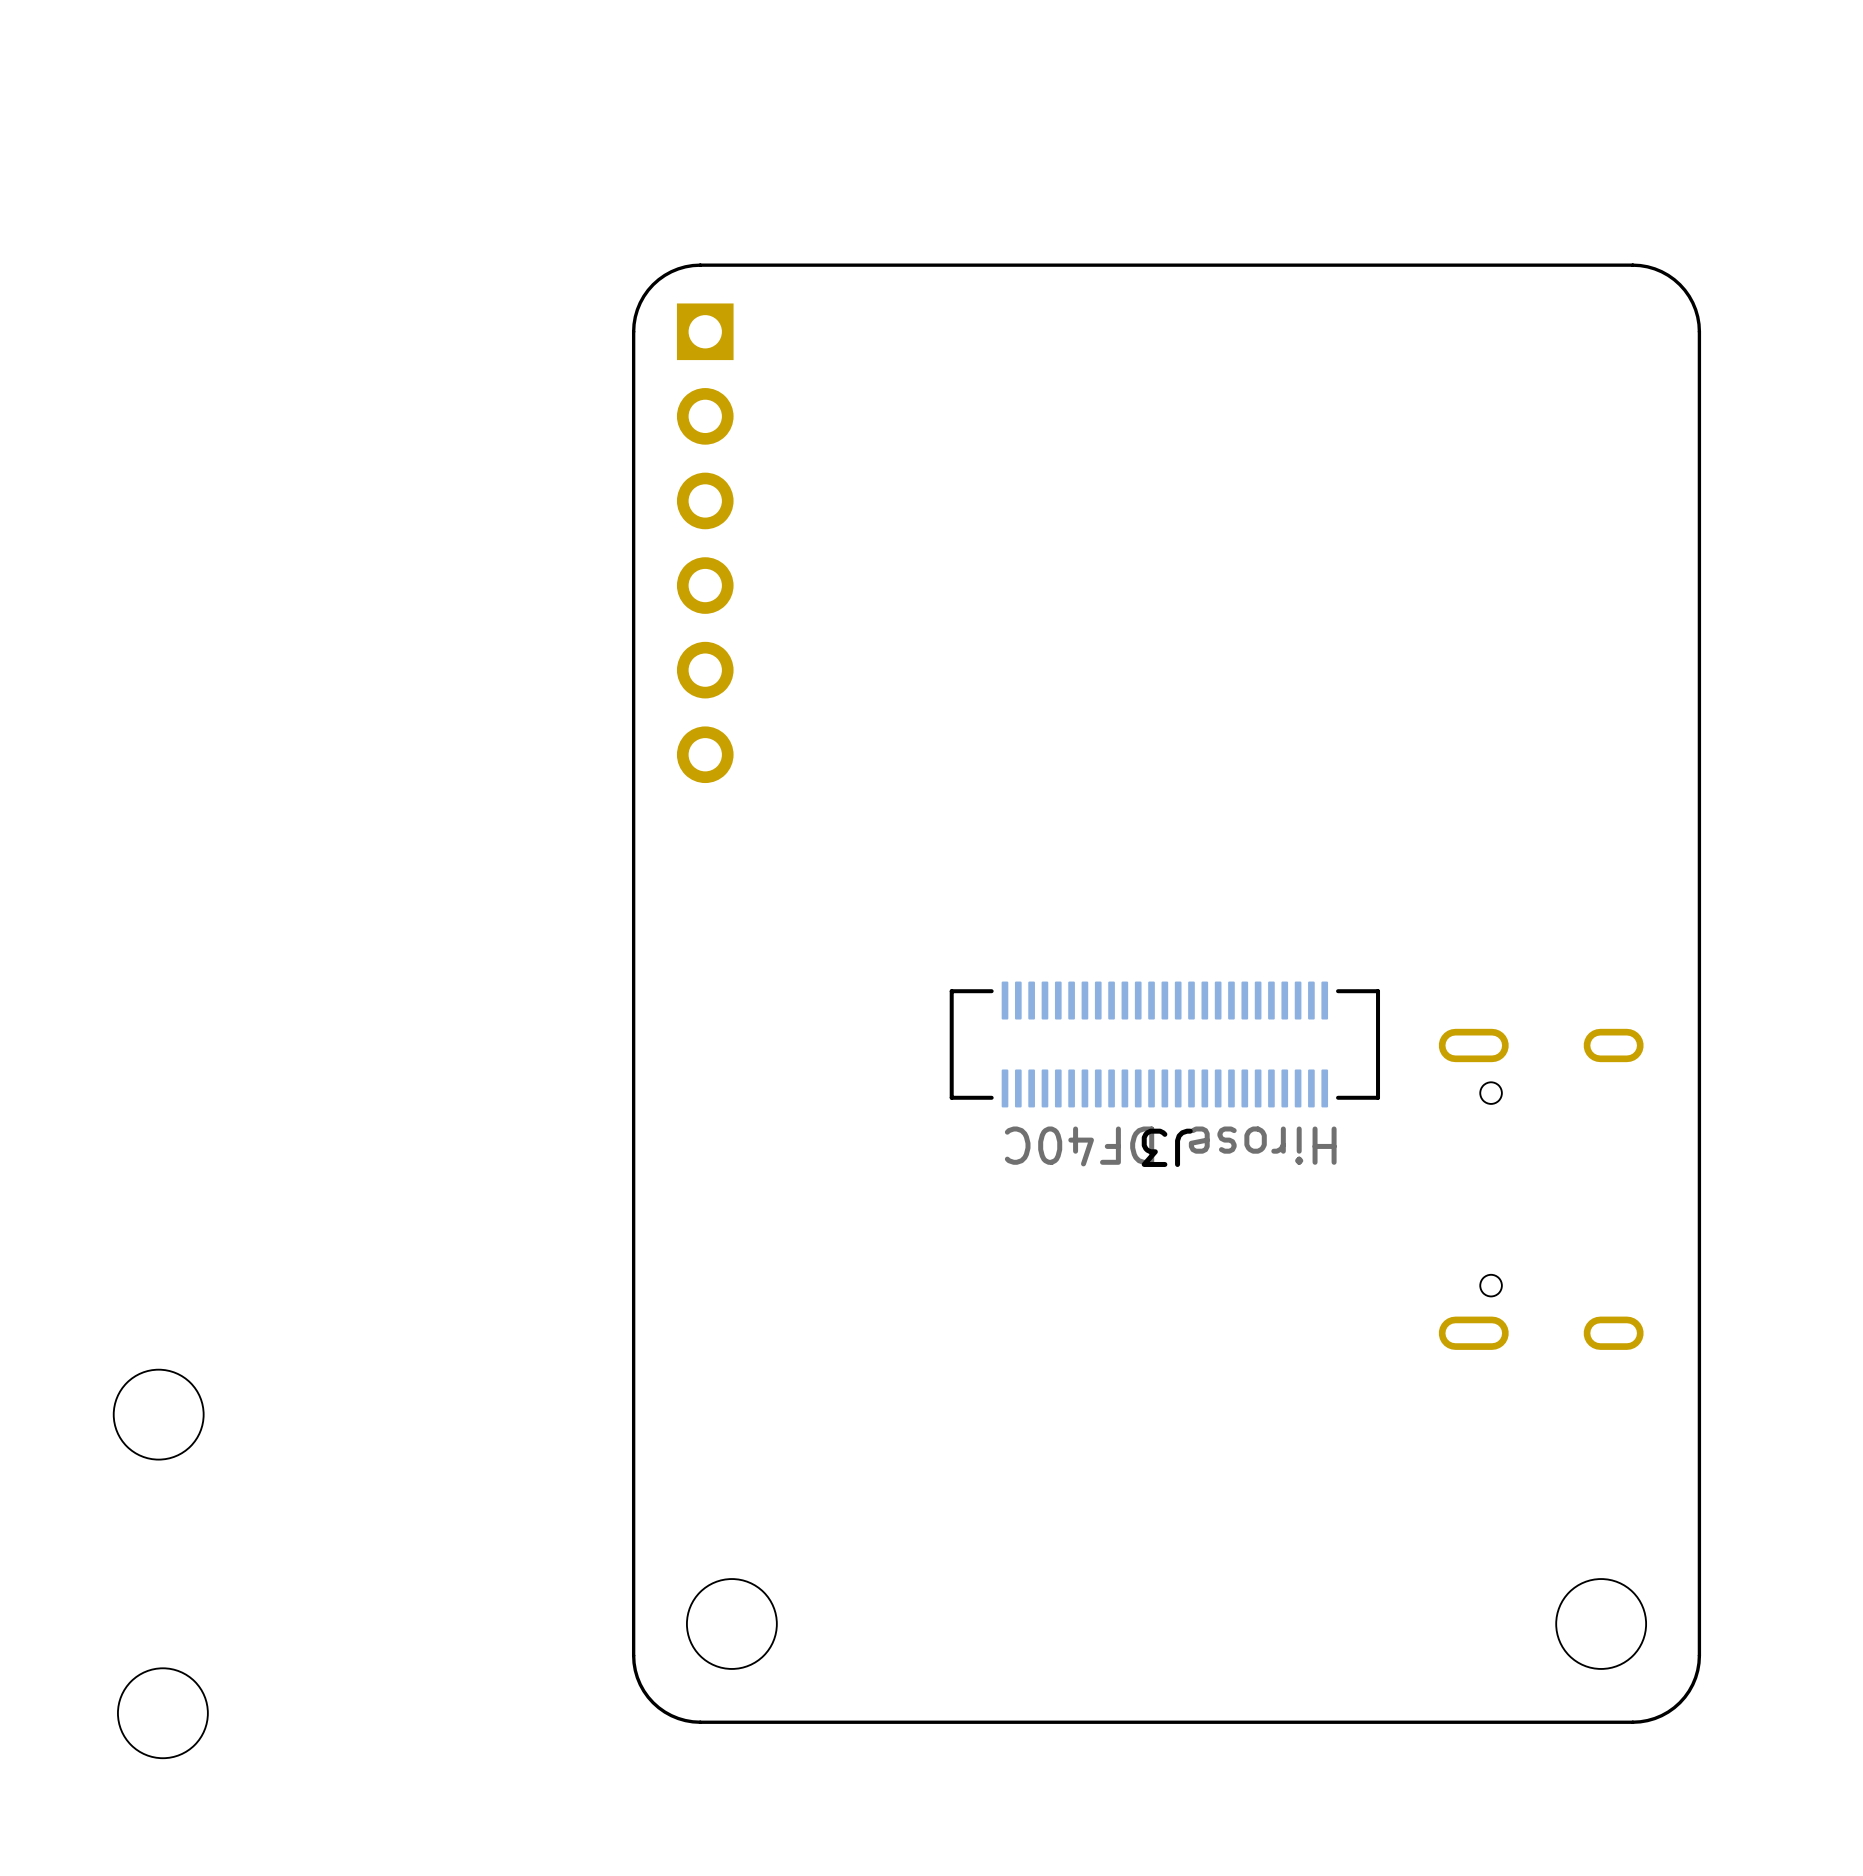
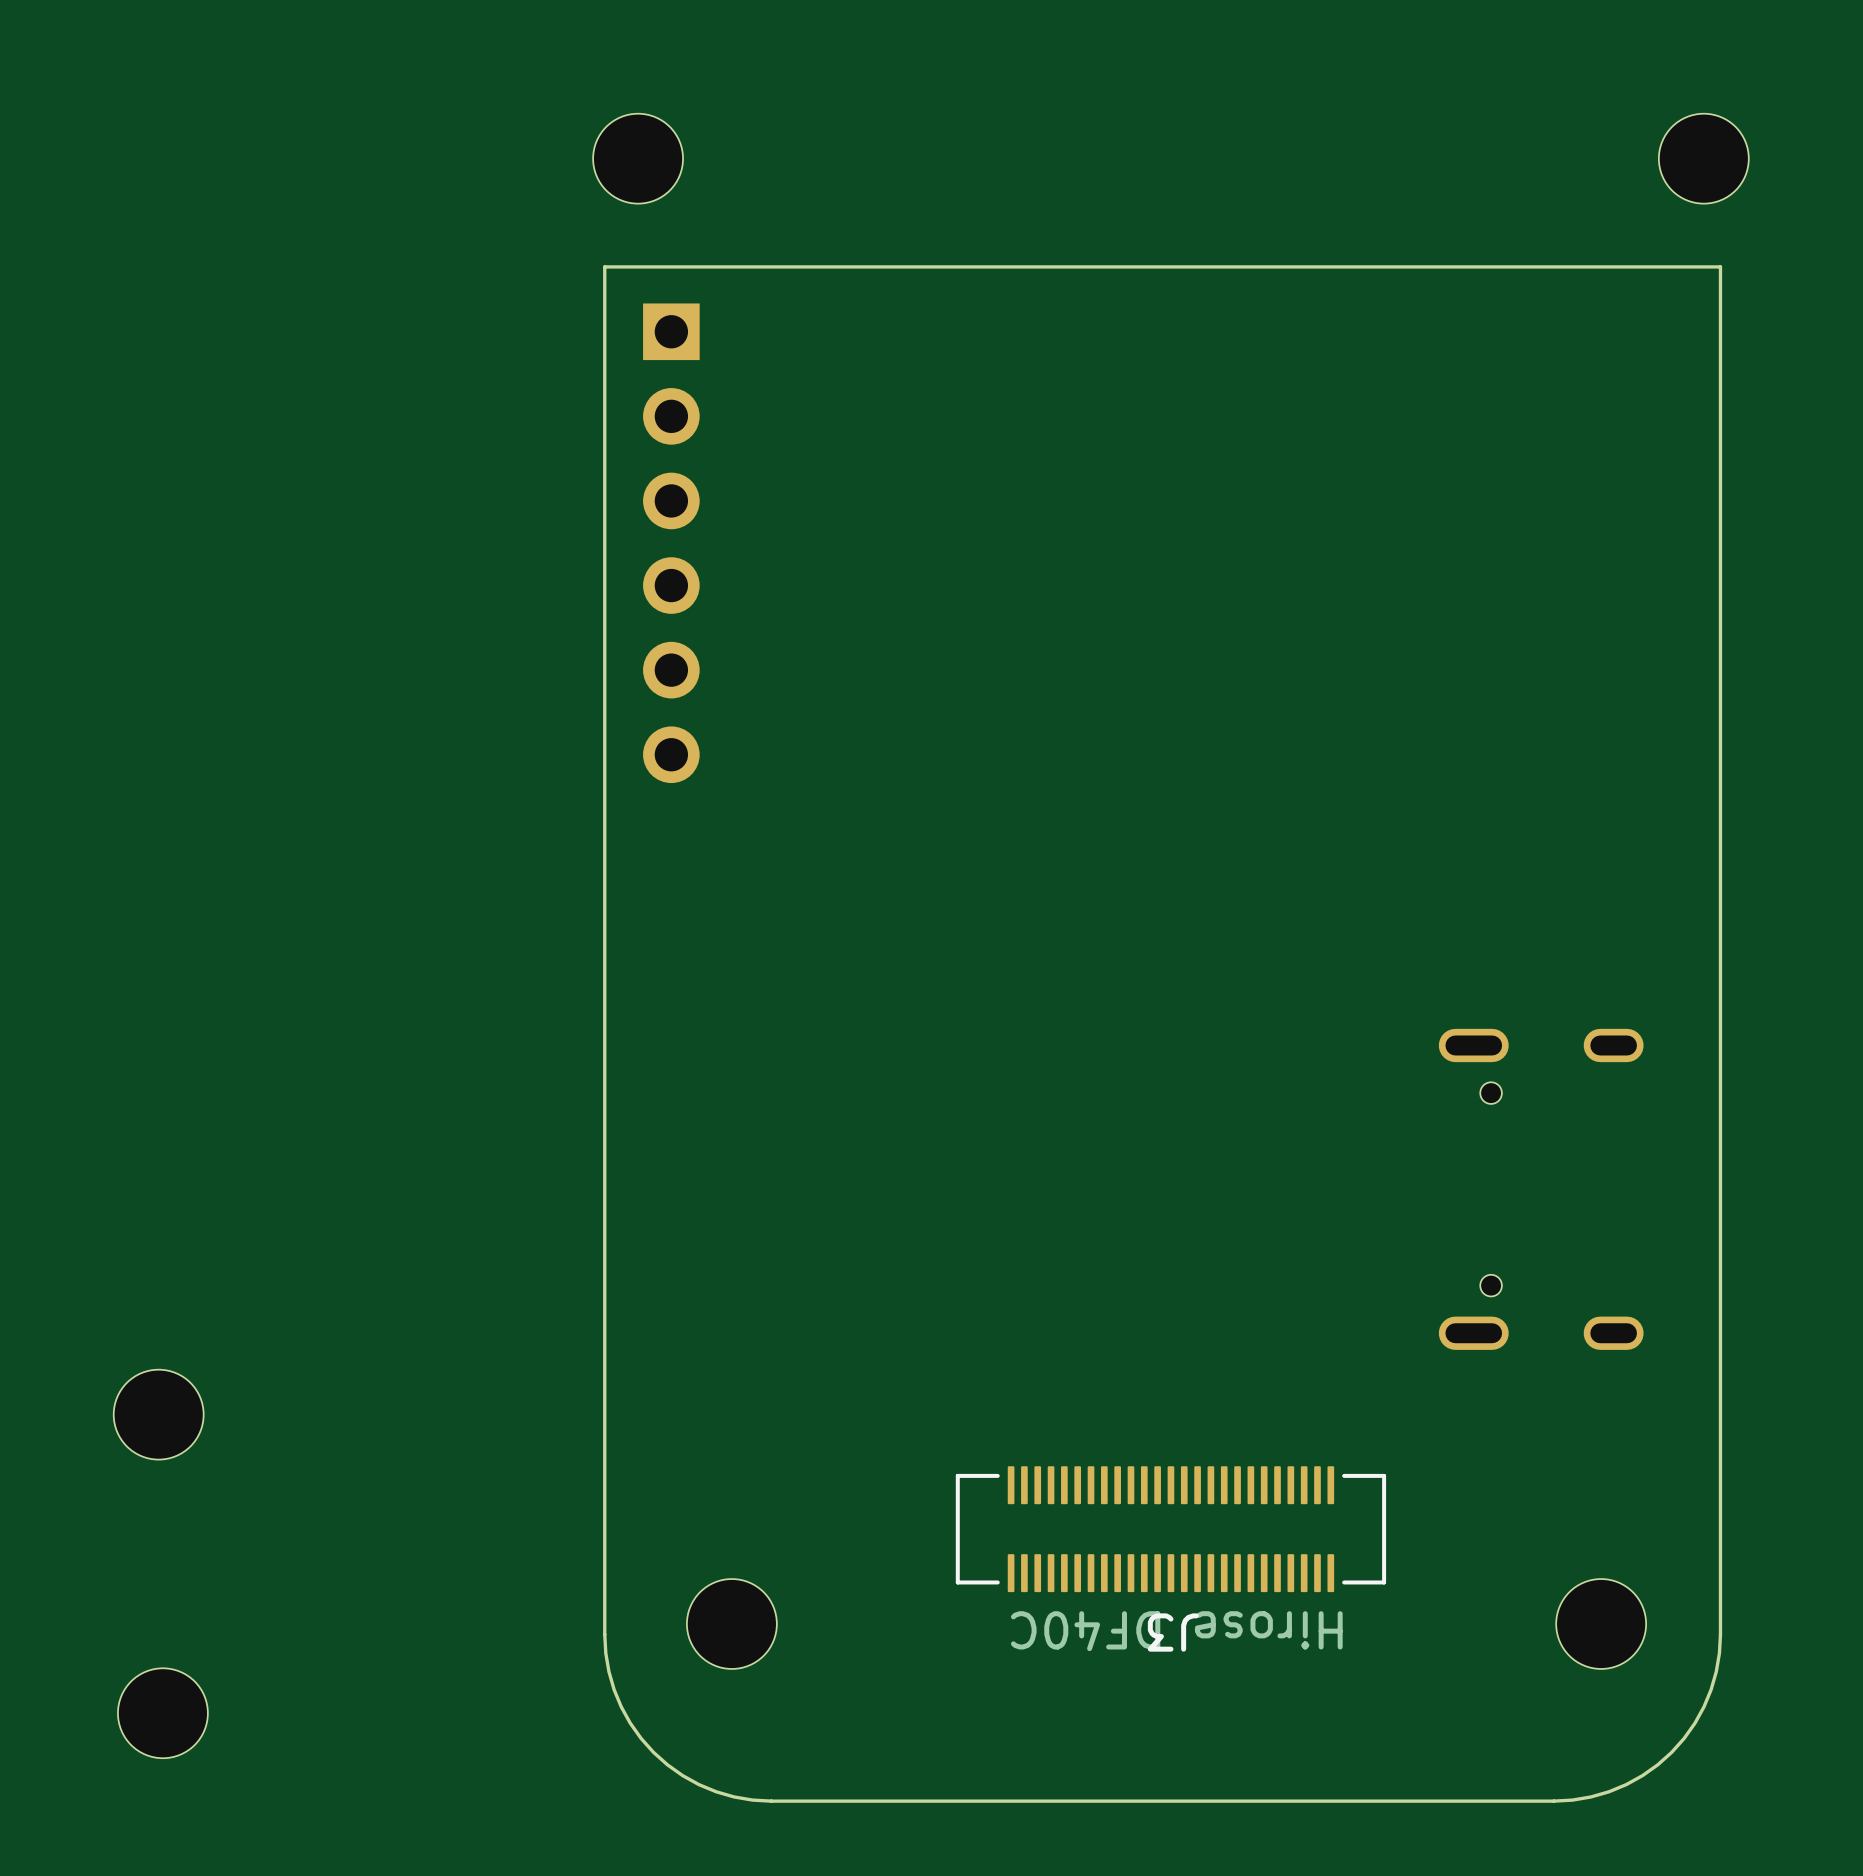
part: none -> (638, 158)
part: none -> (1703, 158)
board edge: (1632, 265) (700, 265) (685, 266) (671, 271) (653, 284) (643, 296) (637, 309) (633, 331) (633, 1655) (635, 1670) (643, 1691) (653, 1702) (664, 1712) (685, 1720) (700, 1722) (1632, 1722) (1647, 1720) (1661, 1715) (1674, 1707) (1689, 1691) (1695, 1677) (1699, 1655) (1699, 331) (1695, 309) (1689, 296) (1679, 284) (1668, 275) (1654, 268) (1632, 265) -> (1720, 266) (1720, 1634) (1716, 1671) (1711, 1689) (1694, 1723) (1671, 1752) (1642, 1775) (1626, 1784) (1591, 1796) (1553, 1801) (771, 1801) (734, 1796) (716, 1791) (682, 1775) (653, 1752) (630, 1723) (614, 1689) (605, 1653) (604, 1634) (604, 266) (1720, 266)
part position: (705, 543) -> (671, 543)
J3 position: (1164, 1044) -> (1170, 1529)

